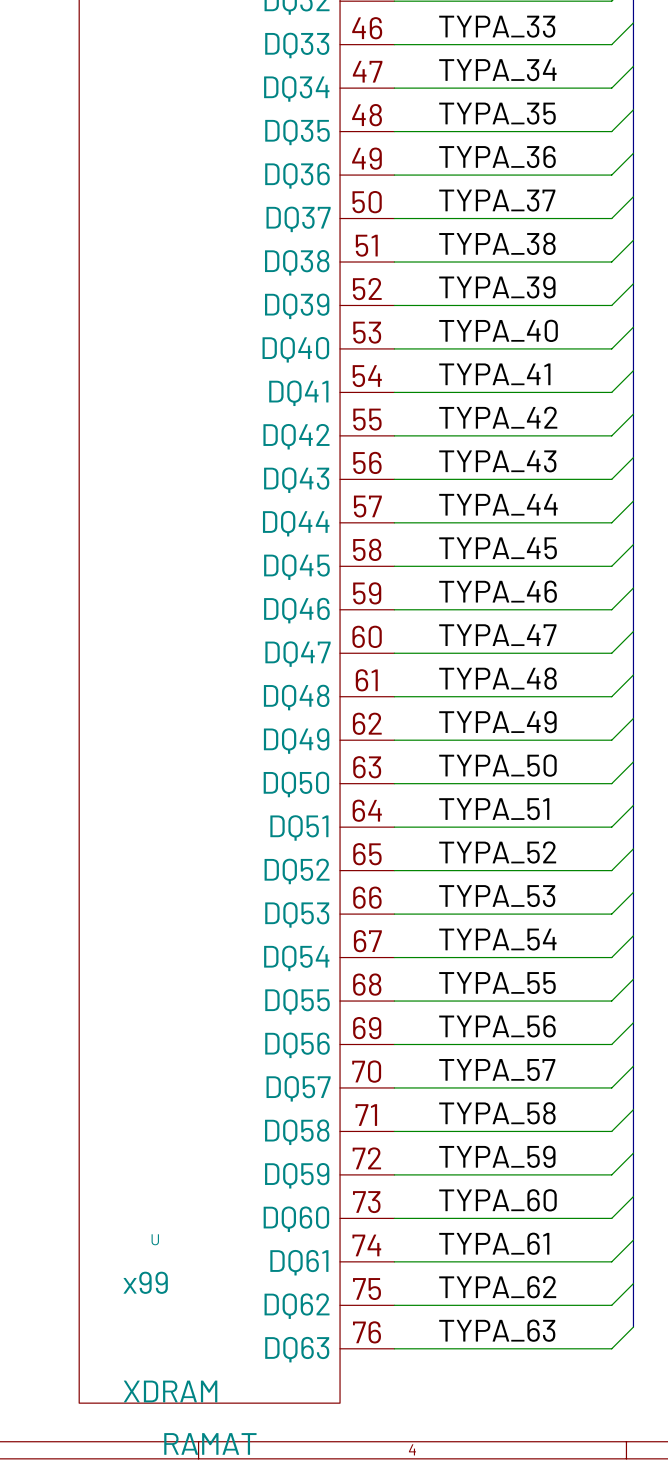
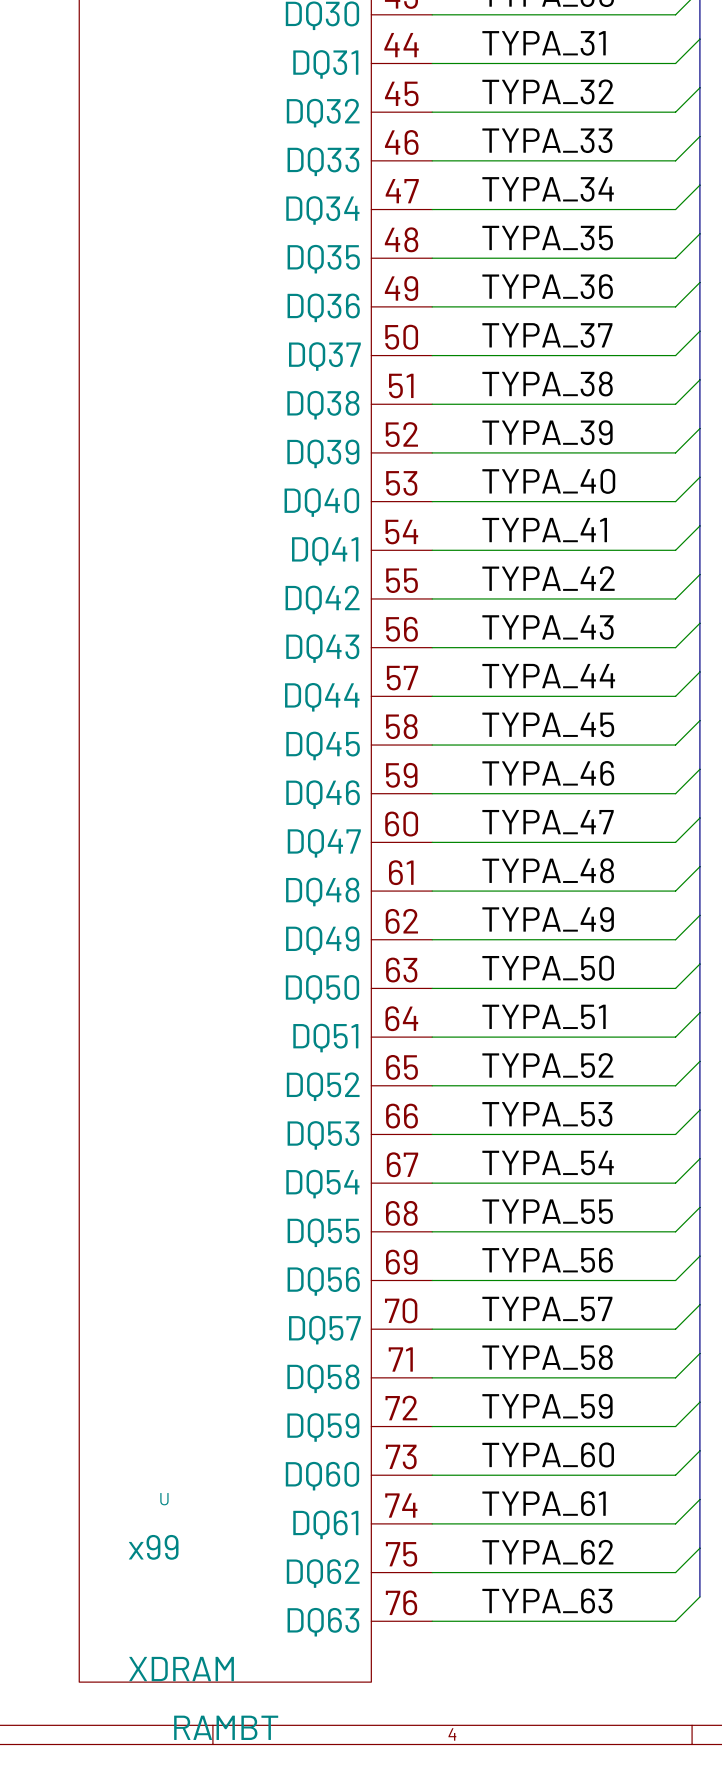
U text: RAMAT (210, 1443) -> RAMBT (226, 1727)

